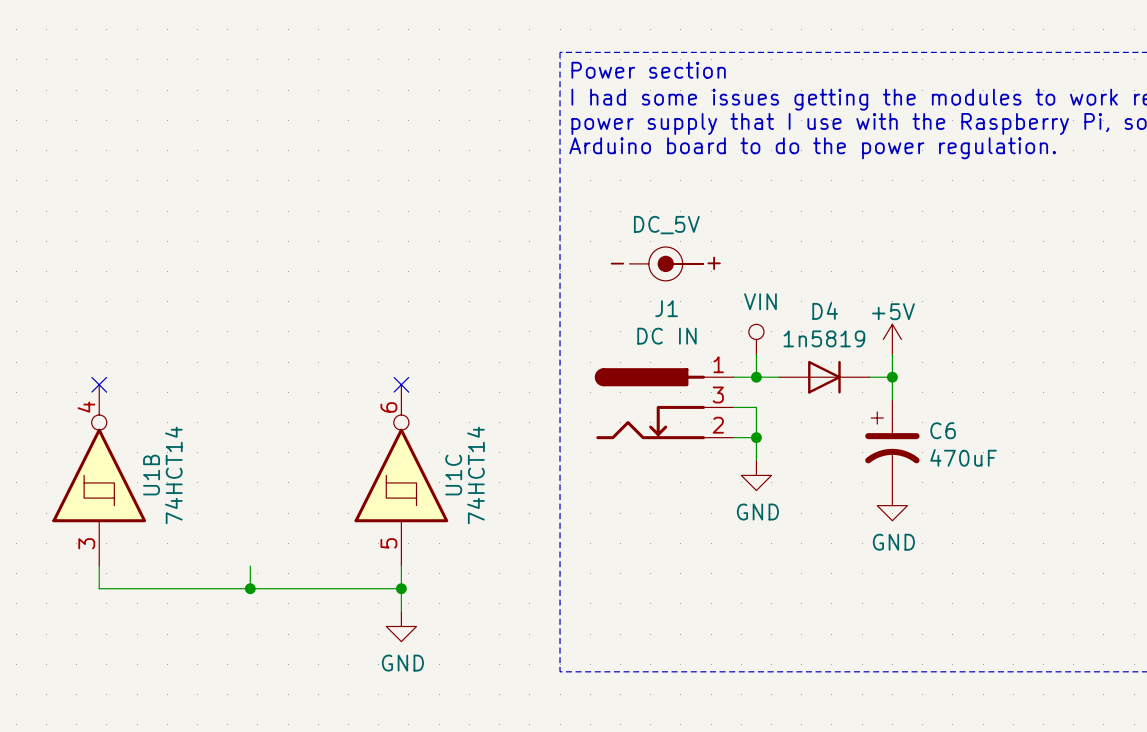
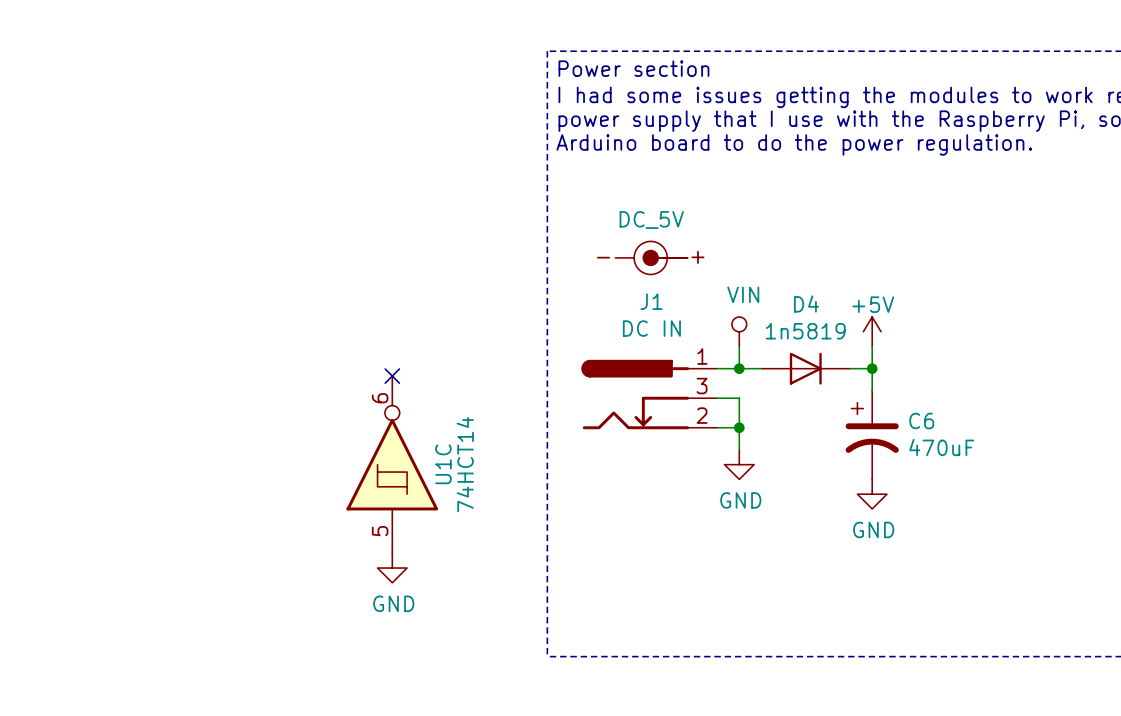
no-connect mark: (99, 384) -> none
U1B: 74HCT14 (99, 475) -> none
wire: (99, 566) (99, 588) (401, 588) -> none
wire: (250, 566) (250, 588) -> none
wire: (401, 566) (401, 611) -> none
junction: (250, 588) -> none
junction: (401, 588) -> none
power symbol position: GND (401, 626) -> GND (392, 568)

